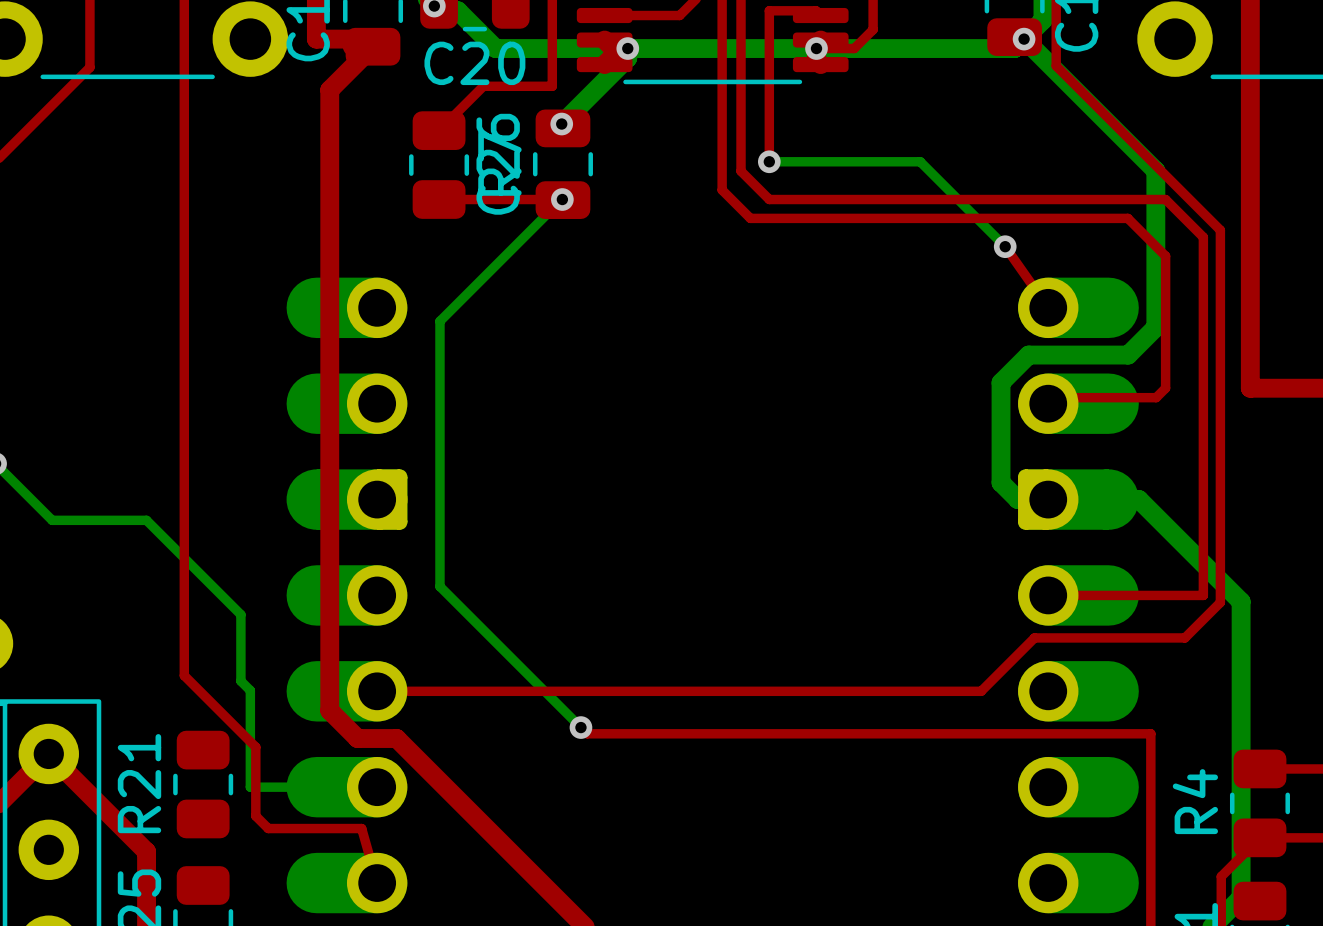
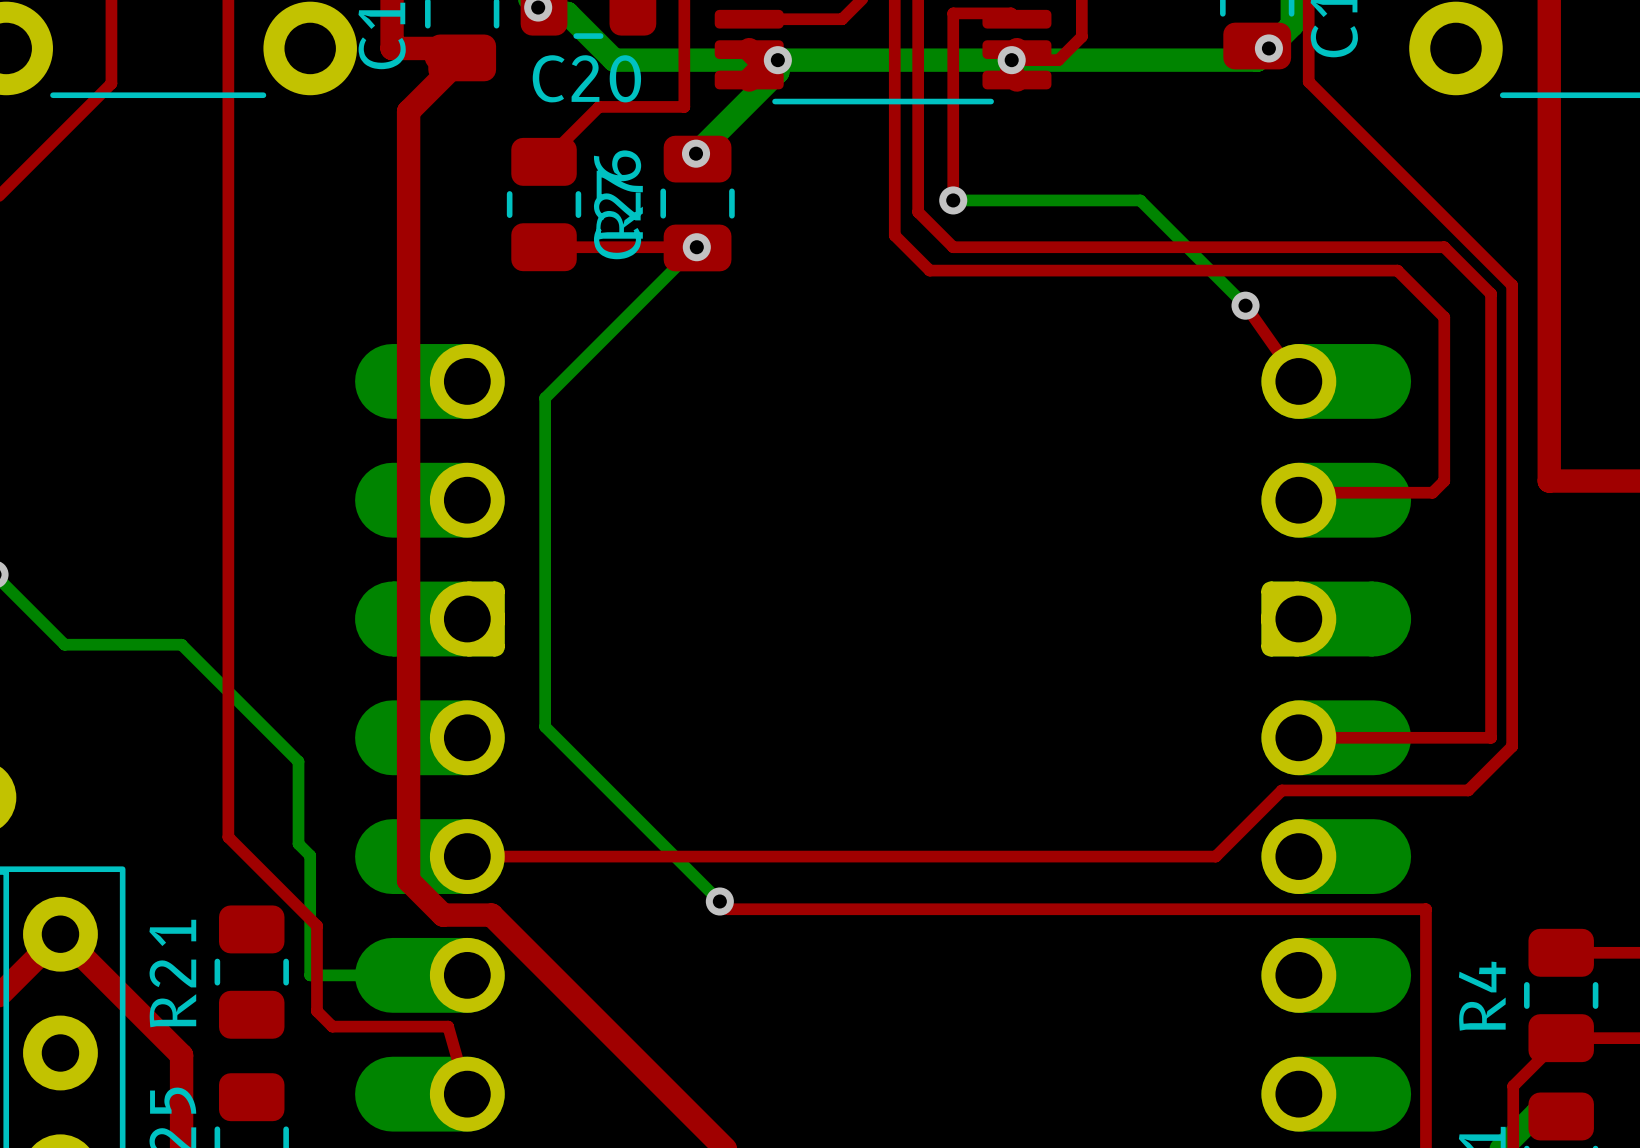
bottom track: (1024, 39) (1155, 170) (1155, 327) (1128, 355) (1028, 355) (1001, 382) (1001, 482) (1017, 499) (1139, 499) (1241, 601) (1241, 897) -> none

